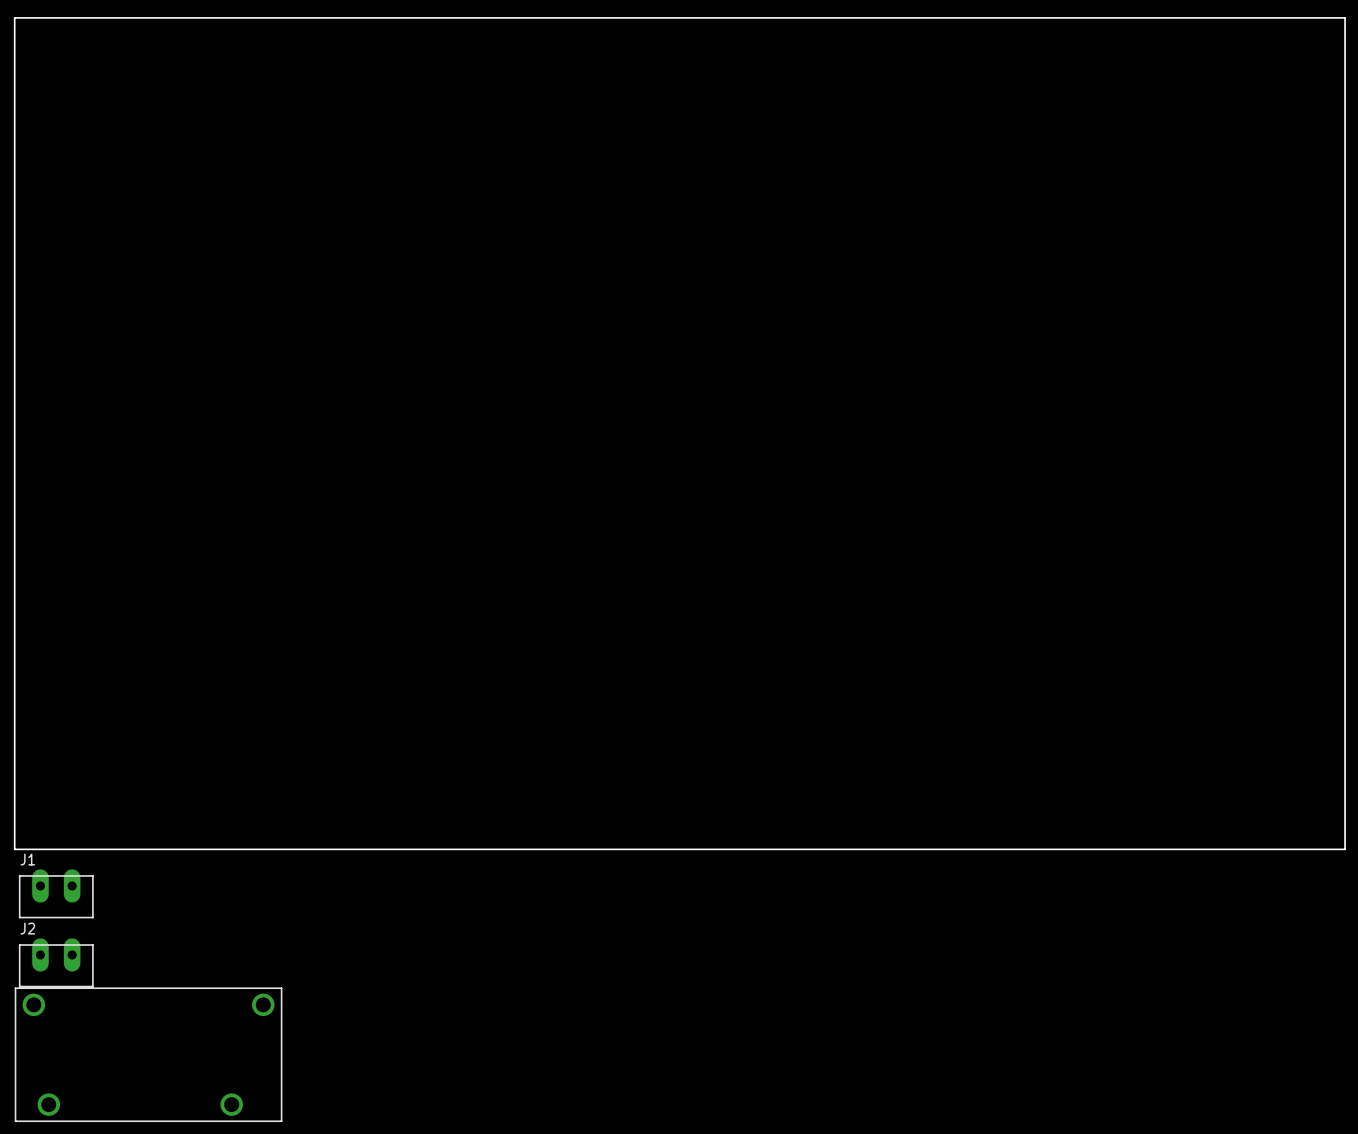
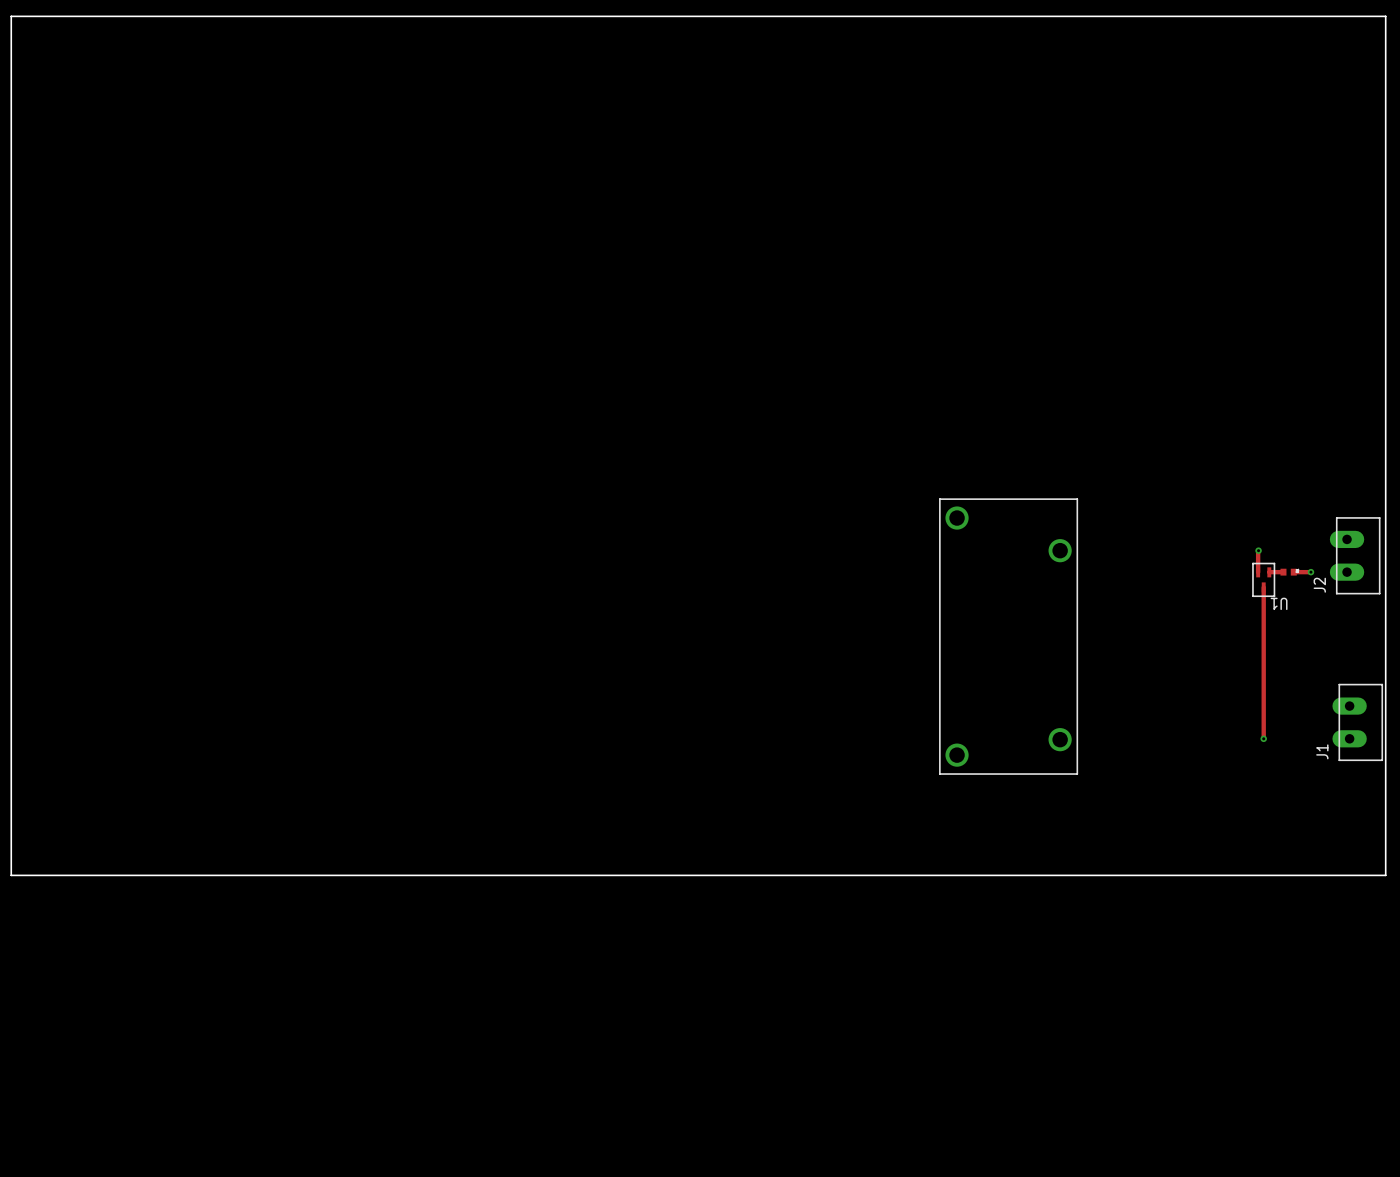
track: none -> (1258, 550) (1258, 572)
via: none -> (1258, 550)
track: none -> (1283, 572) (1269, 572)
part: none -> (1288, 572)
track: none -> (1293, 572) (1310, 572)
via: none -> (1310, 572)
U1: none -> (1263, 579)
track: none -> (1263, 587) (1263, 738)
part: none -> (1008, 636)
via: none -> (1263, 738)
J1 rotation: 0° (56, 893) -> 90° counterclockwise (1357, 722)
J1 position: (56, 893) -> (1357, 722)
J2 rotation: 0° (56, 962) -> 90° counterclockwise (1355, 555)
J2 position: (56, 962) -> (1355, 555)
part: (148, 1054) -> none

